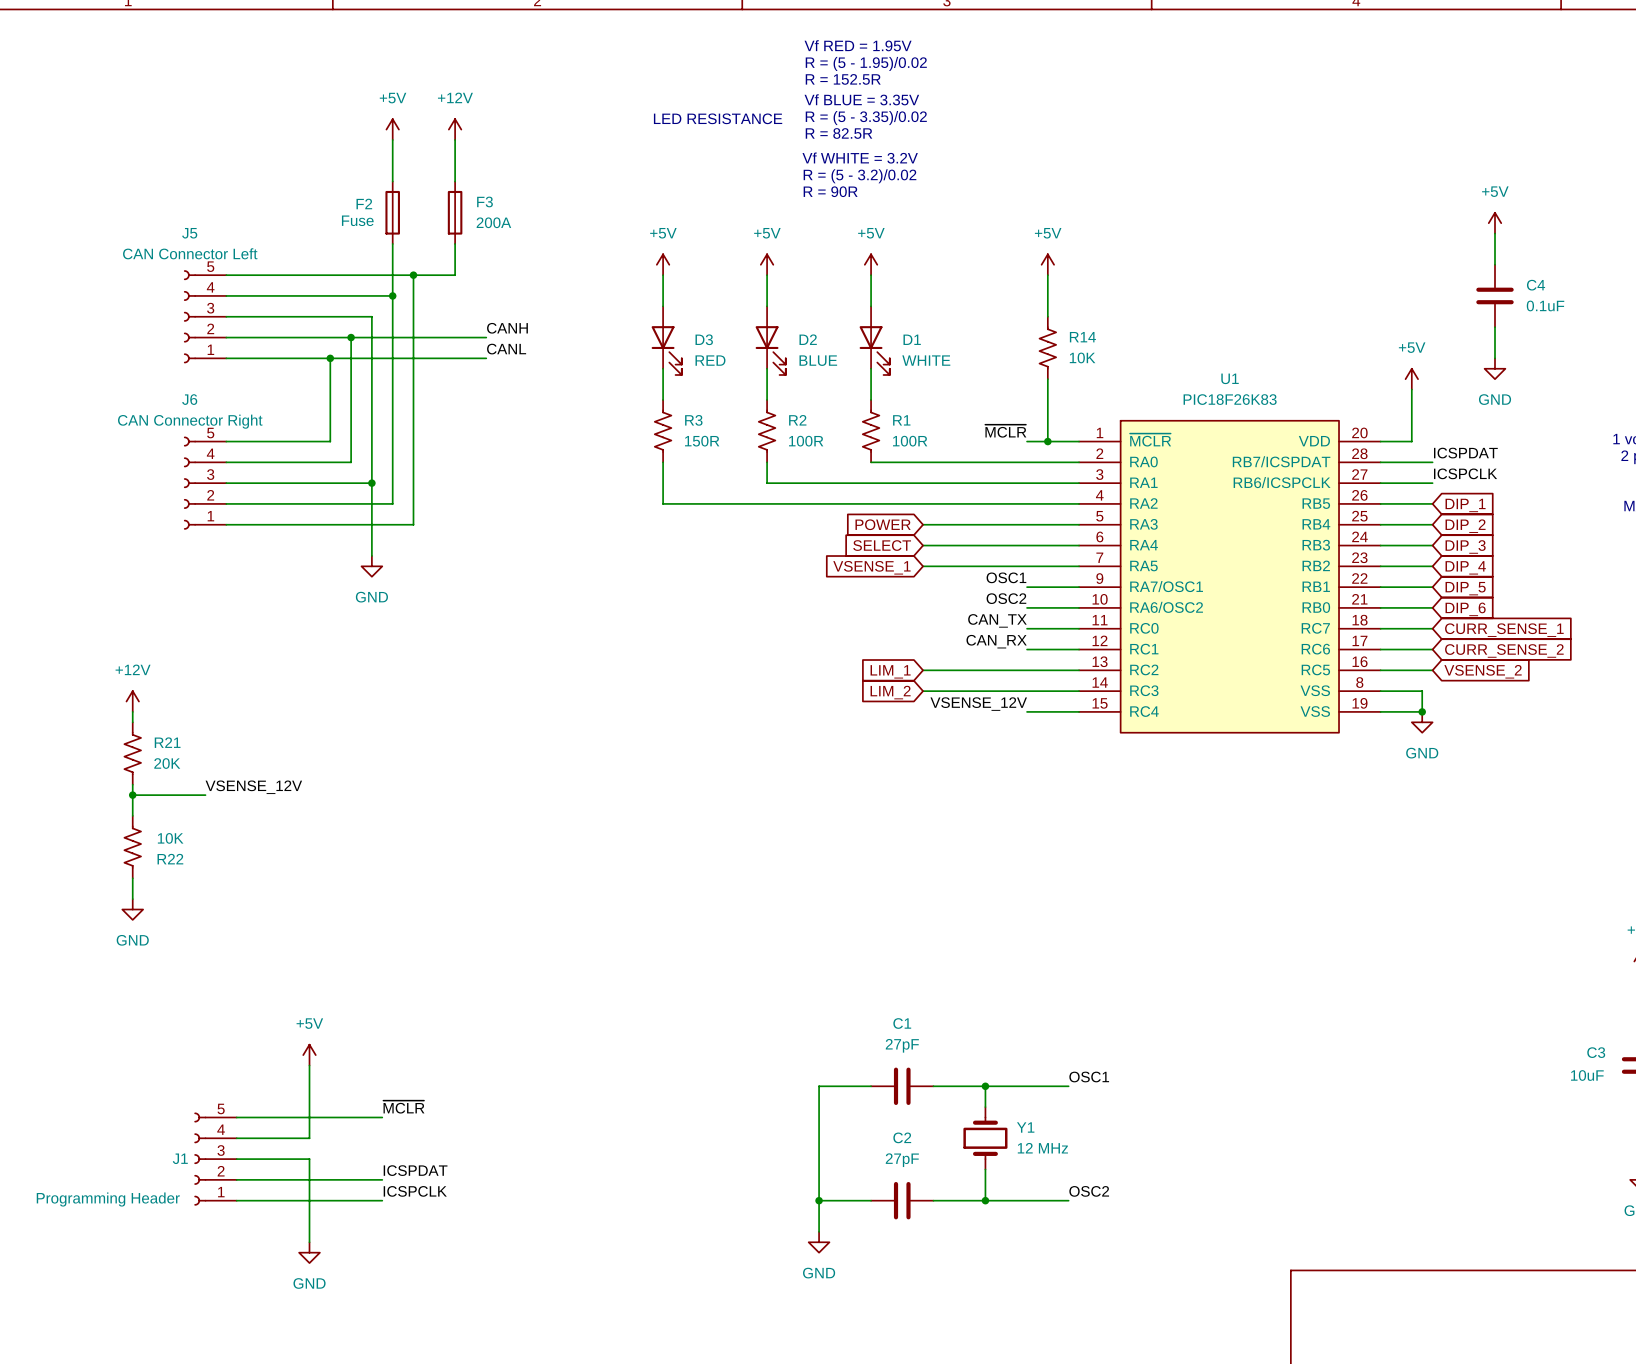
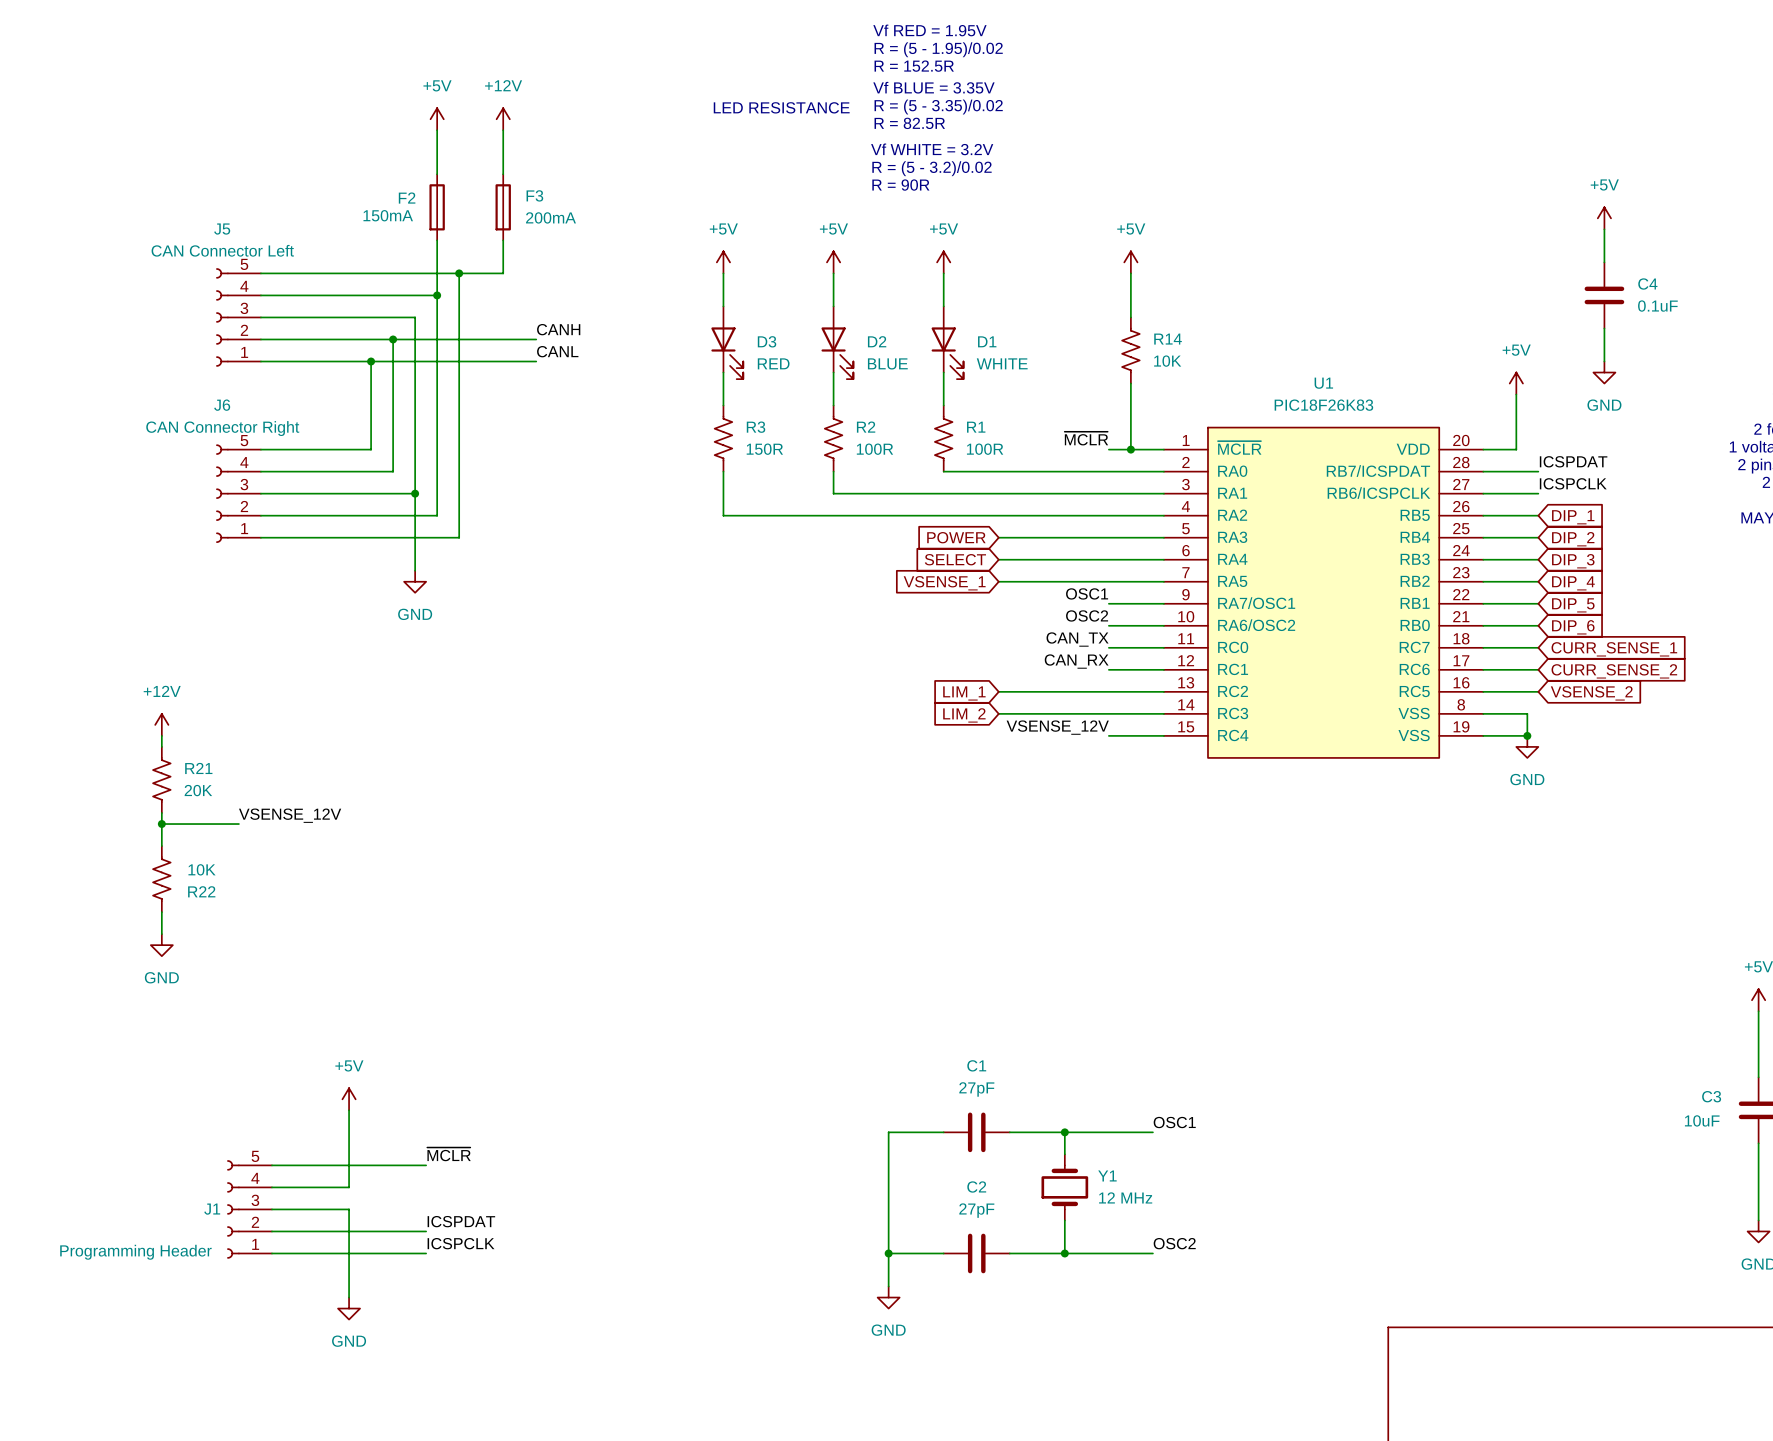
F2 value: Fuse (357, 220) -> 150mA (388, 215)
F3 value: 200A (493, 222) -> 200mA (550, 217)

